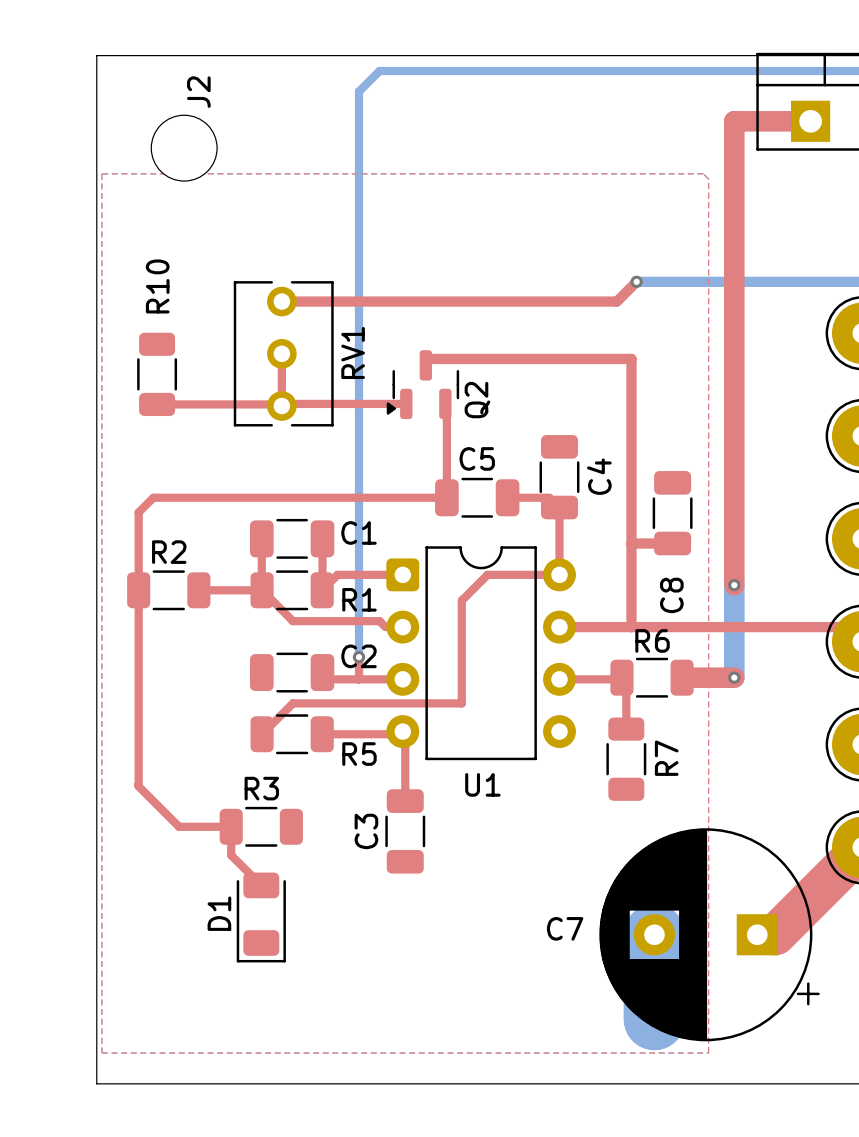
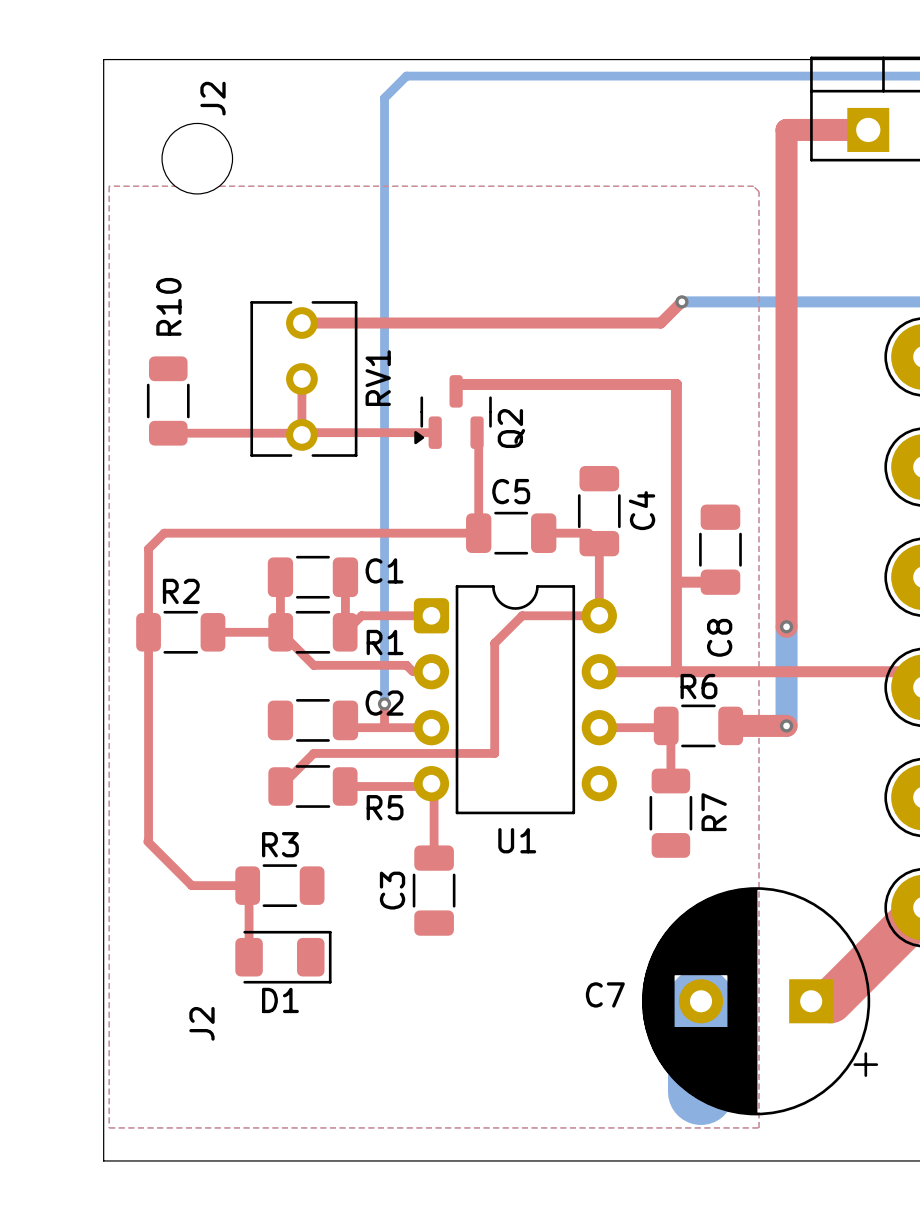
top track: (231, 826) (231, 855) (261, 885) -> none
top track: none -> (249, 887) (249, 957)
D1 rotation: 0° (261, 917) -> 90° counterclockwise (283, 957)
text: none -> J2 (201, 1023)

